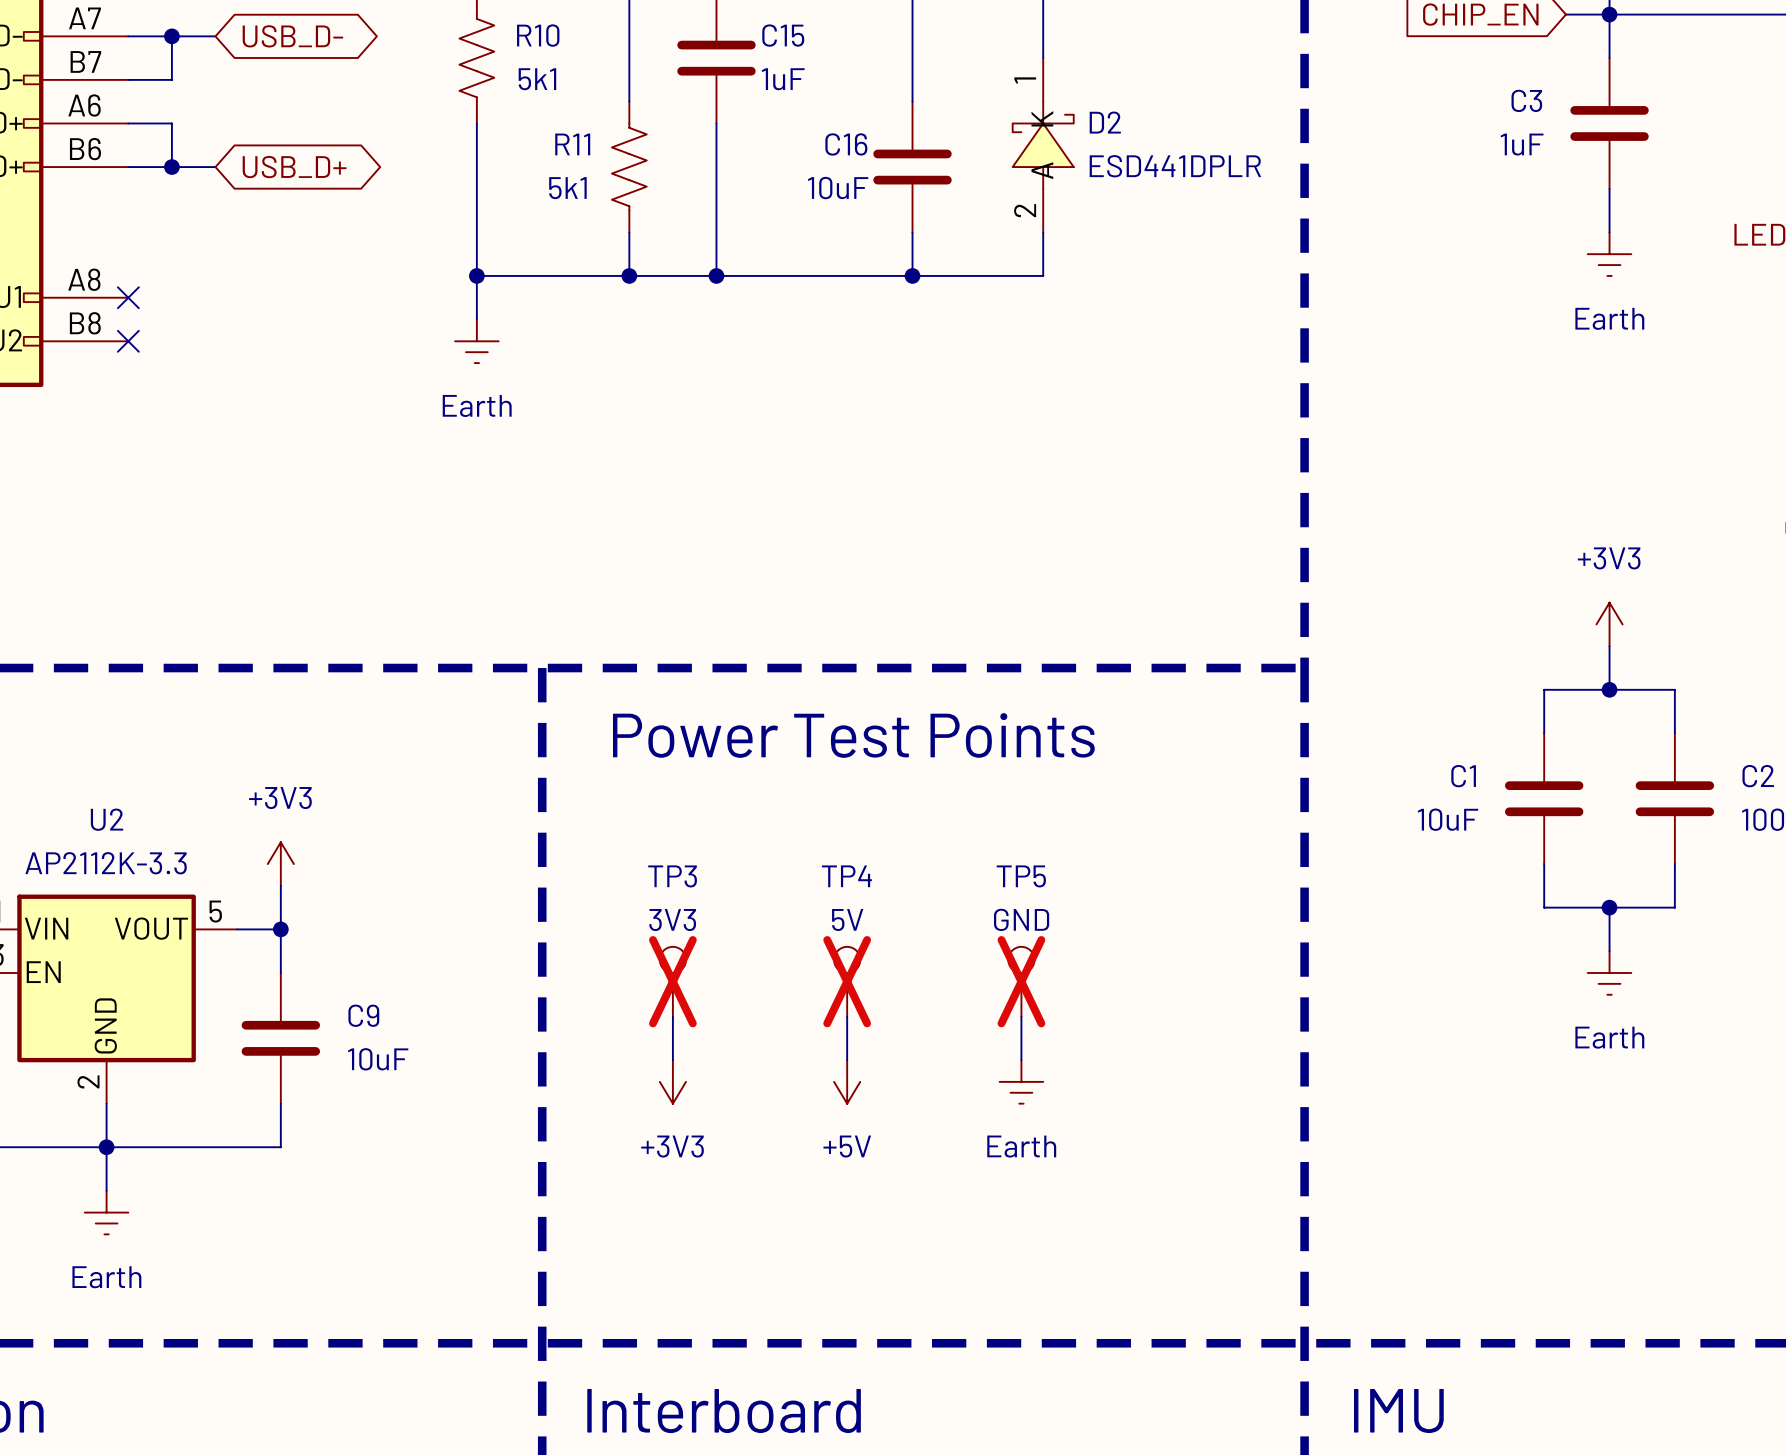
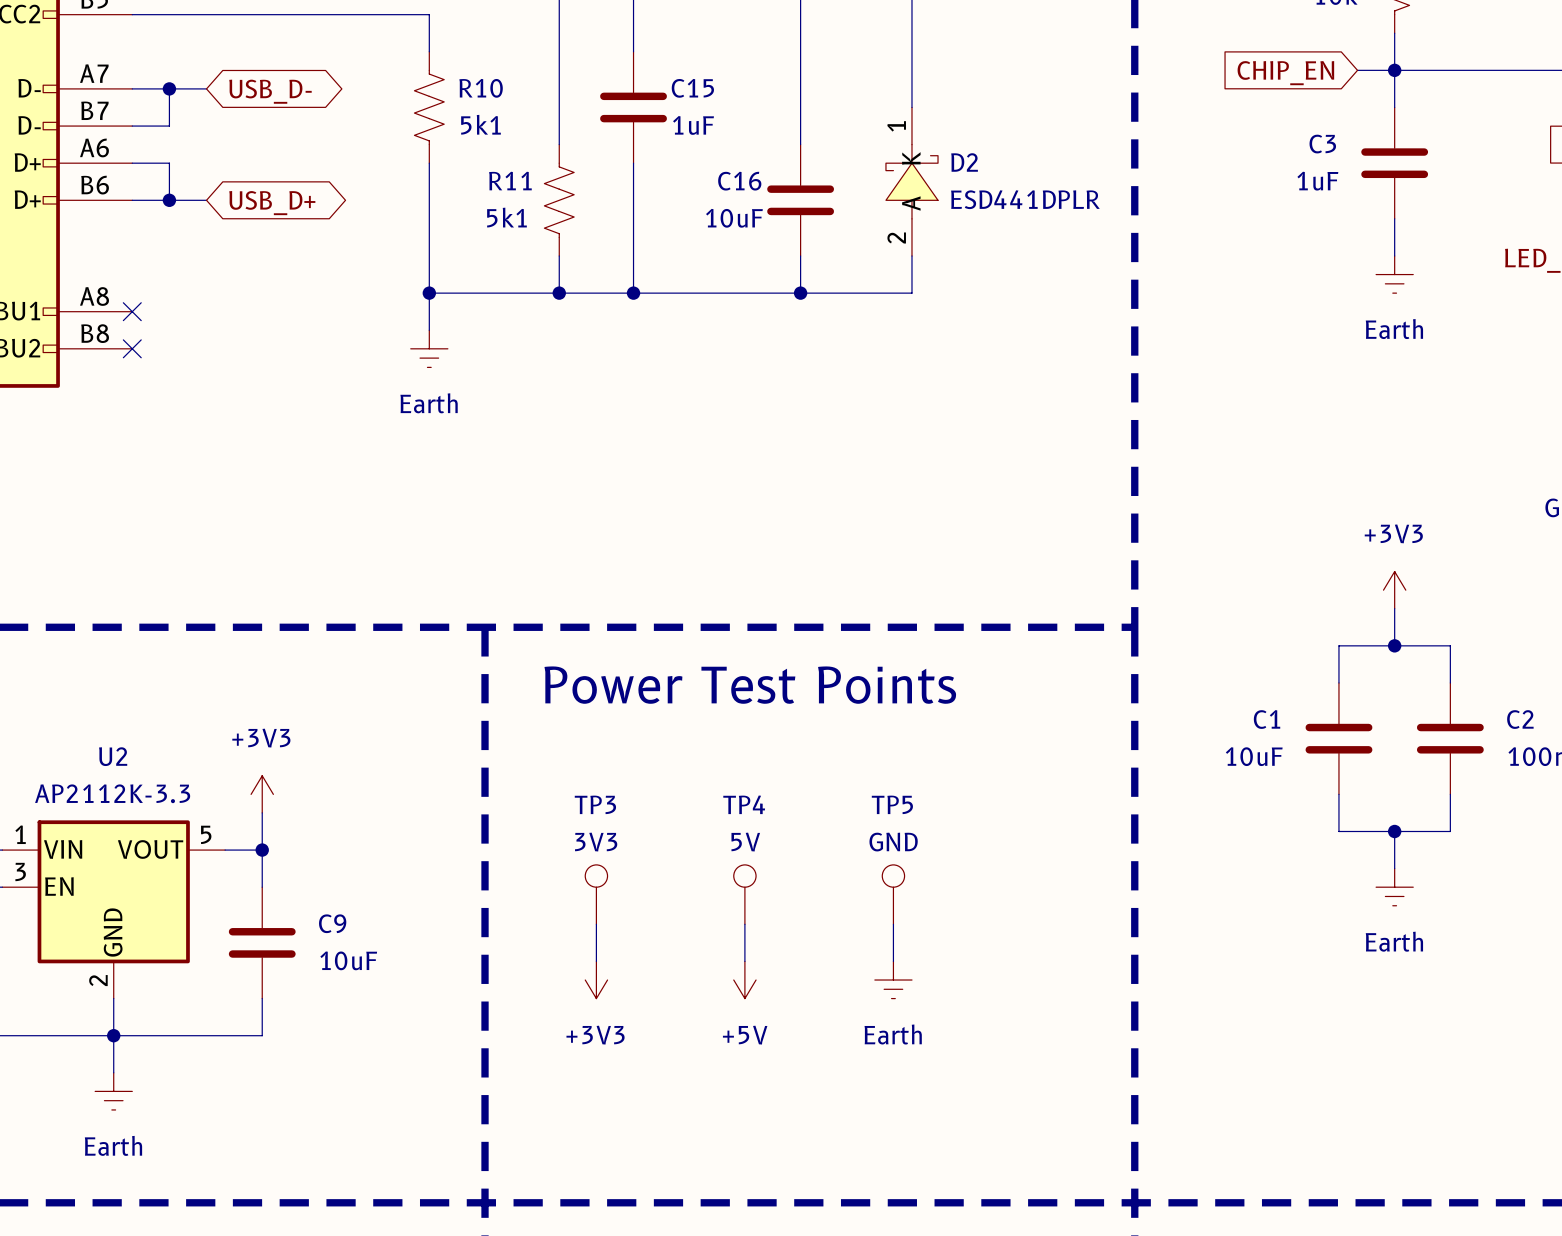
TP3 do-not-place cross: (672, 981) -> none
TP4 do-not-place cross: (847, 981) -> none
TP5 do-not-place cross: (1021, 981) -> none

